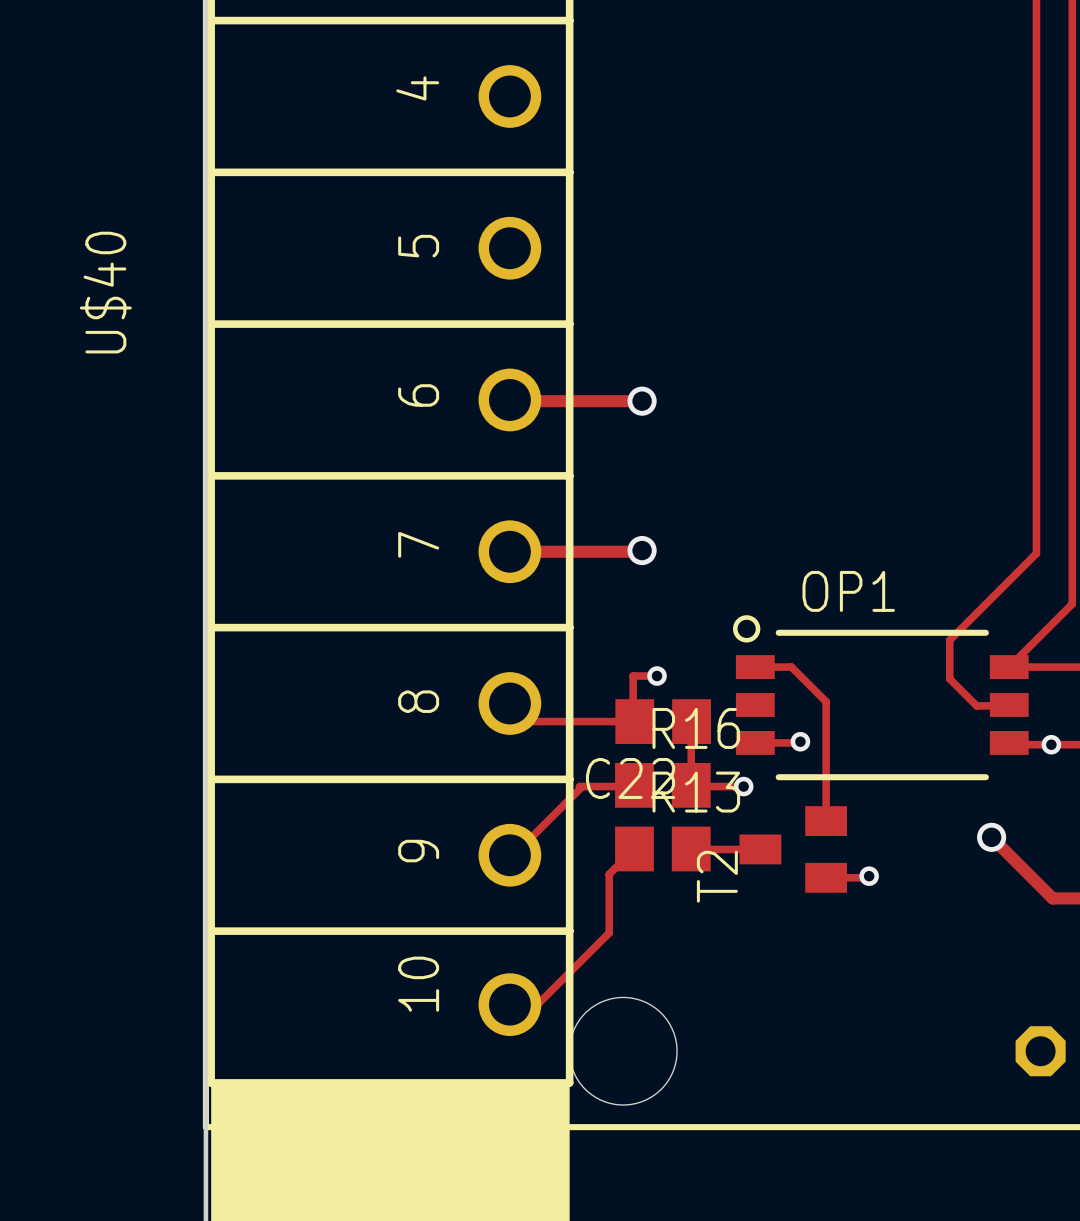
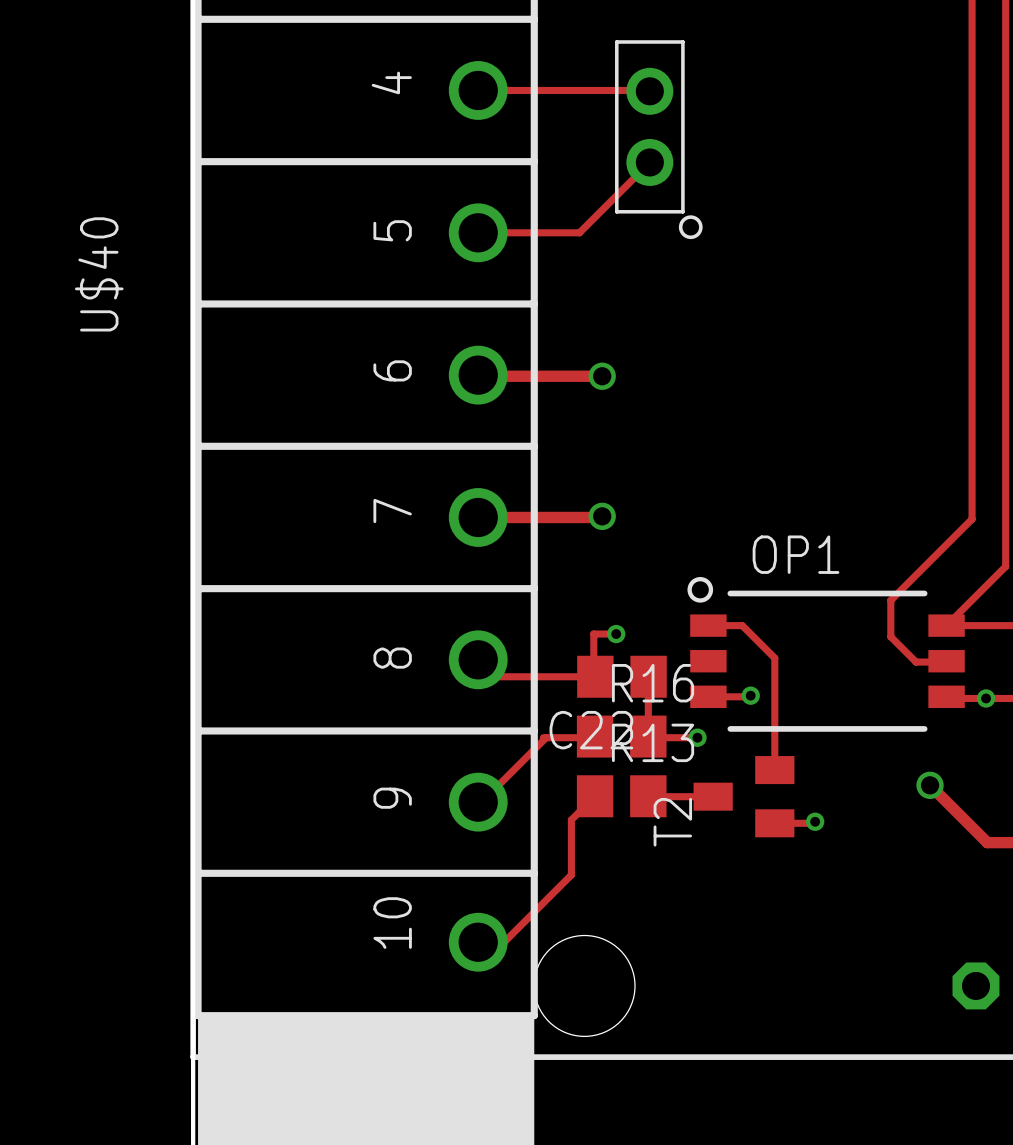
track: none -> (478, 90) (649, 91)
part: none -> (658, 139)
track: none -> (649, 162) (579, 232) (478, 232)

